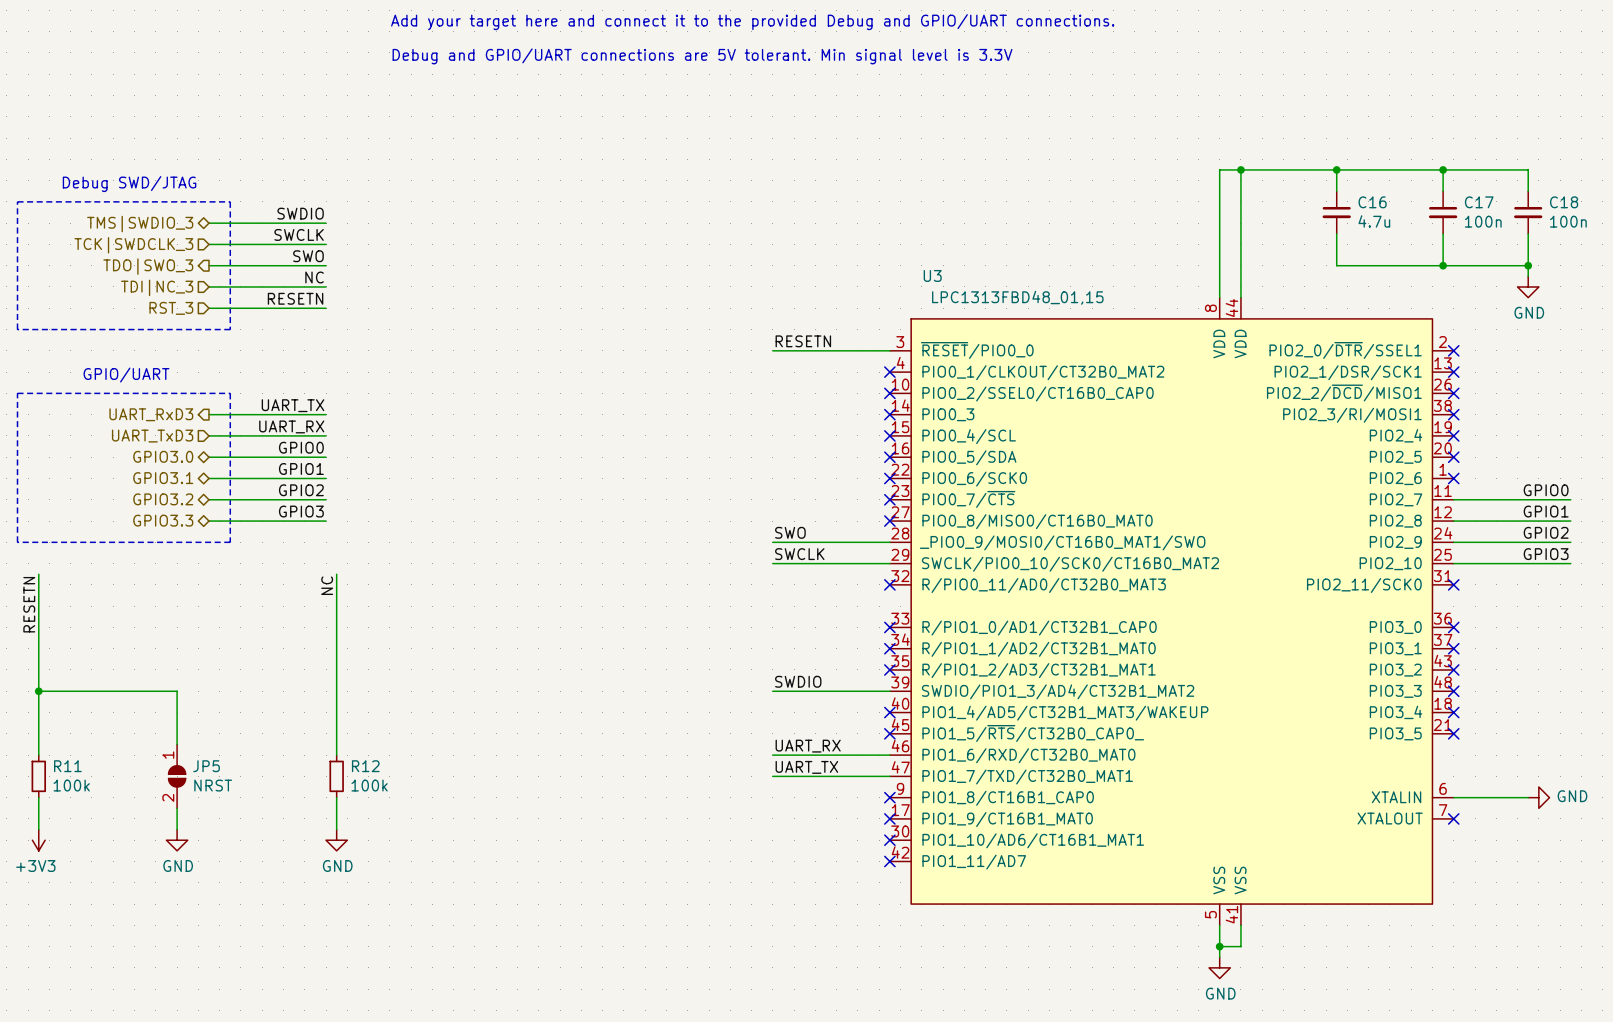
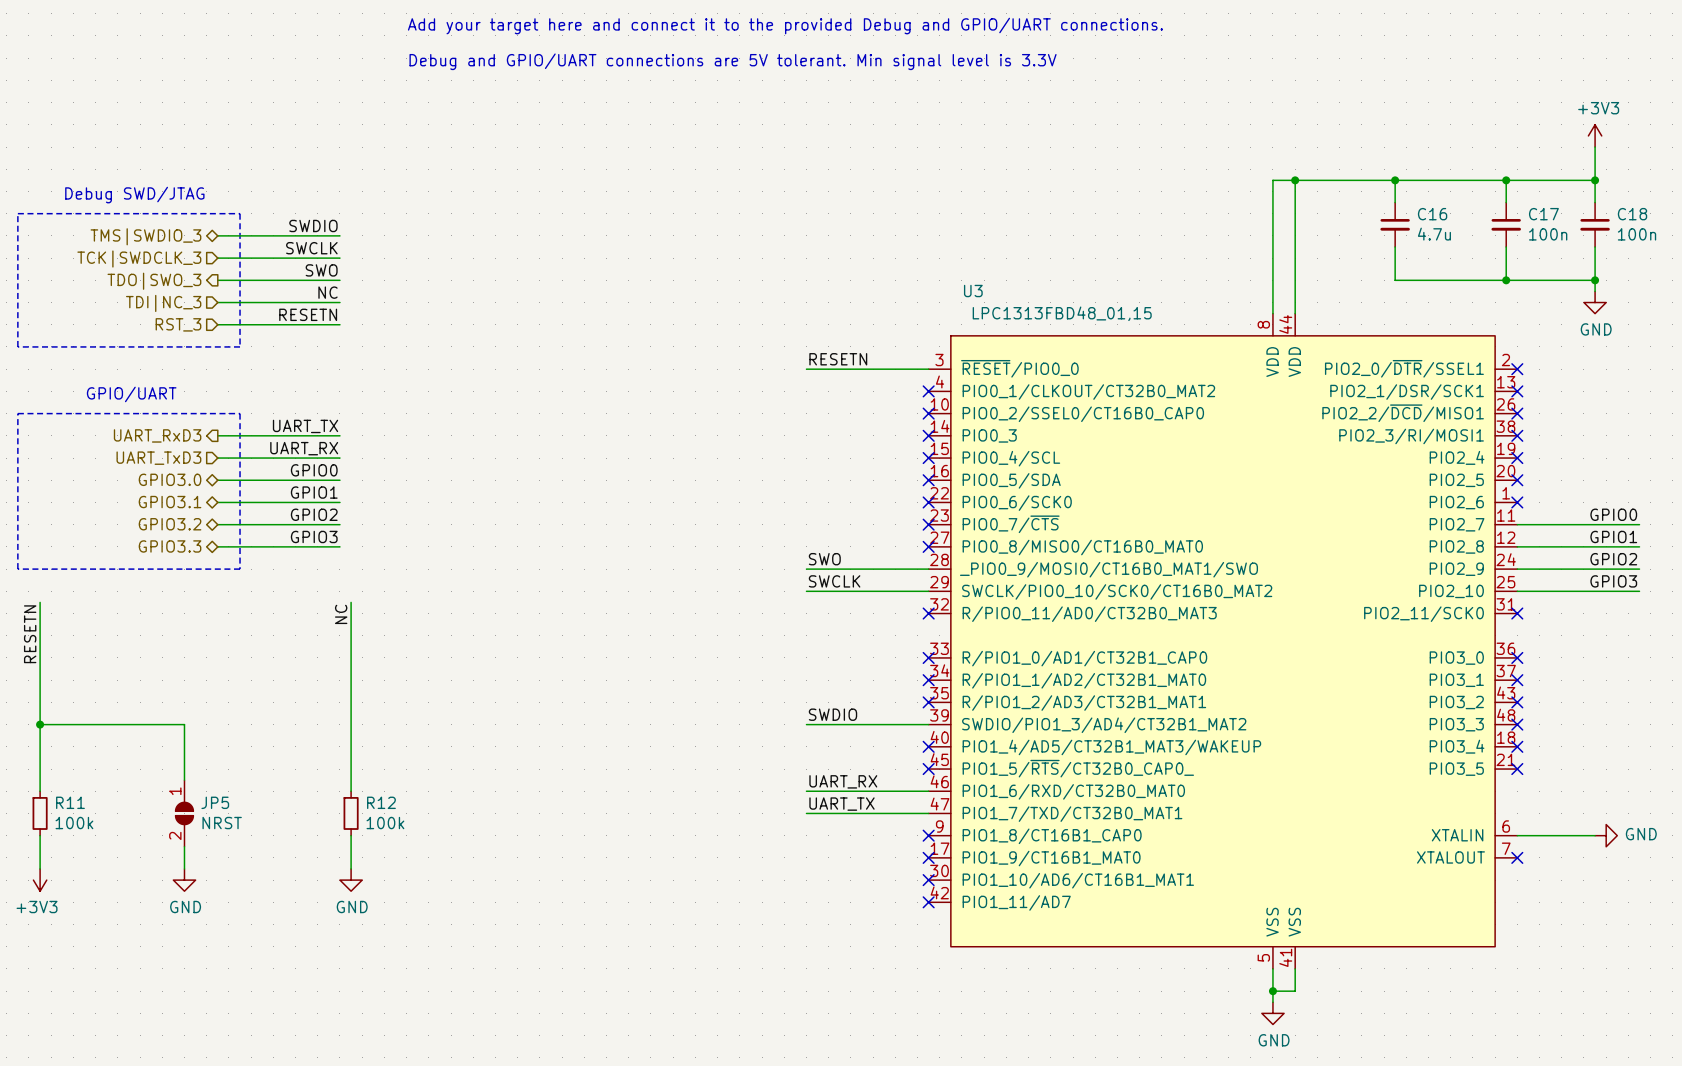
power symbol: none -> +3V3 (1595, 135)
wire: none -> (1595, 147) (1595, 180)
junction: none -> (1595, 180)

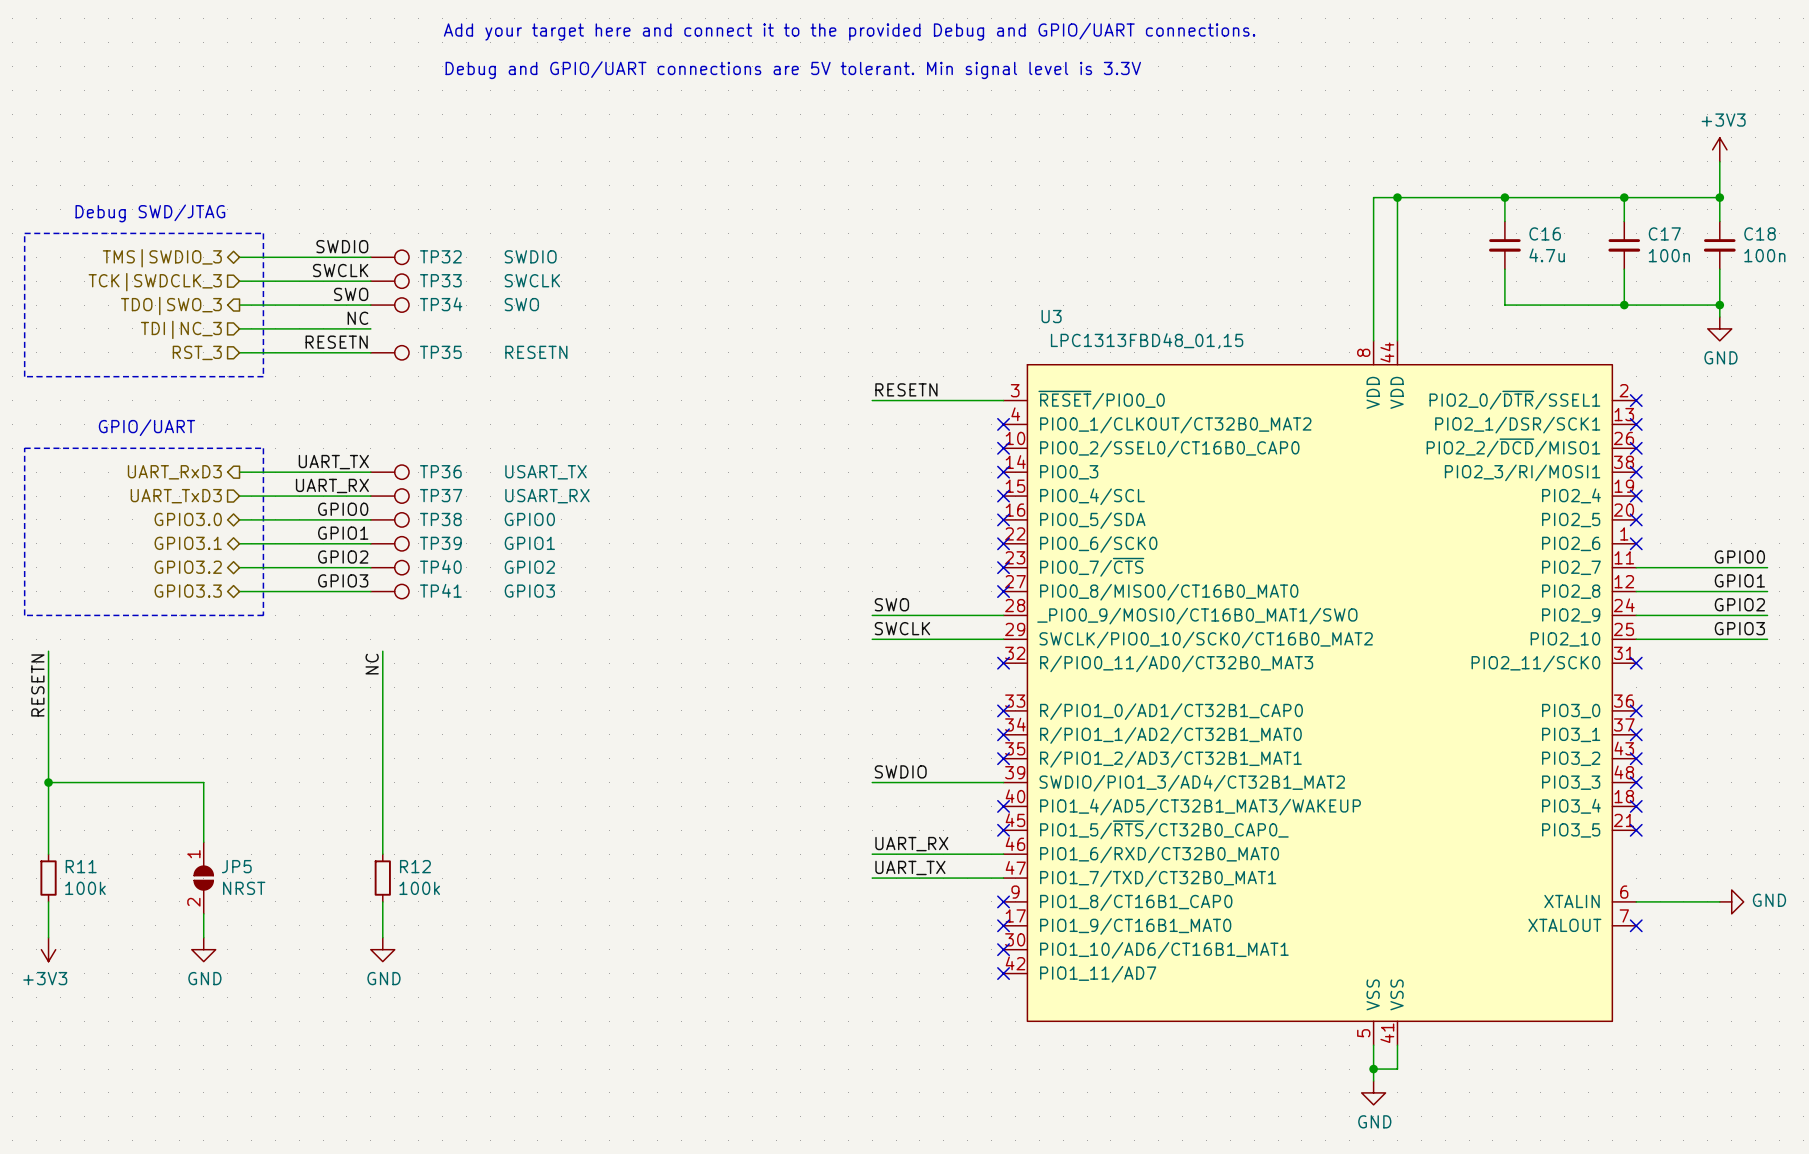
TP32: none -> SWDIO (389, 257)
TP33: none -> SWCLK (389, 281)
TP34: none -> SWO (389, 305)
TP35: none -> RESETN (389, 352)
TP36: none -> USART_TX (389, 472)
TP37: none -> USART_RX (389, 496)
TP38: none -> GPIO0 (389, 519)
TP39: none -> GPIO1 (389, 543)
TP40: none -> GPIO2 (389, 567)
TP41: none -> GPIO3 (389, 591)

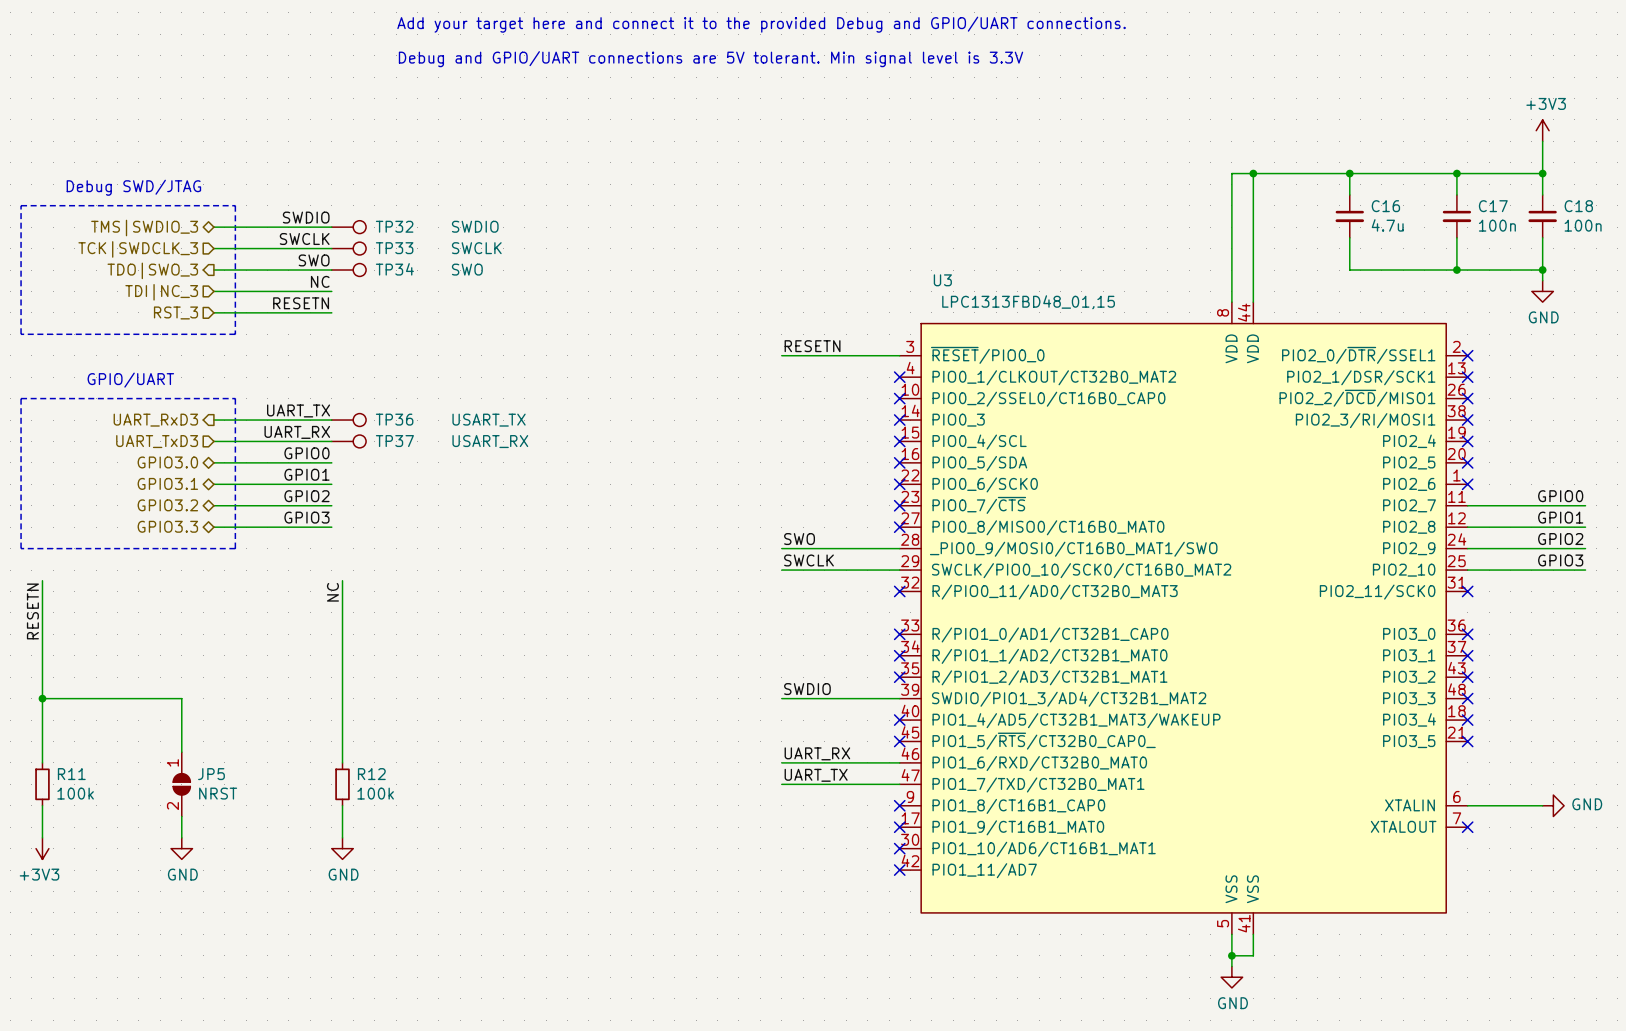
TP35: RESETN (389, 352) -> none
TP38: GPIO0 (389, 519) -> none
TP39: GPIO1 (389, 543) -> none
TP40: GPIO2 (389, 567) -> none
TP41: GPIO3 (389, 591) -> none

